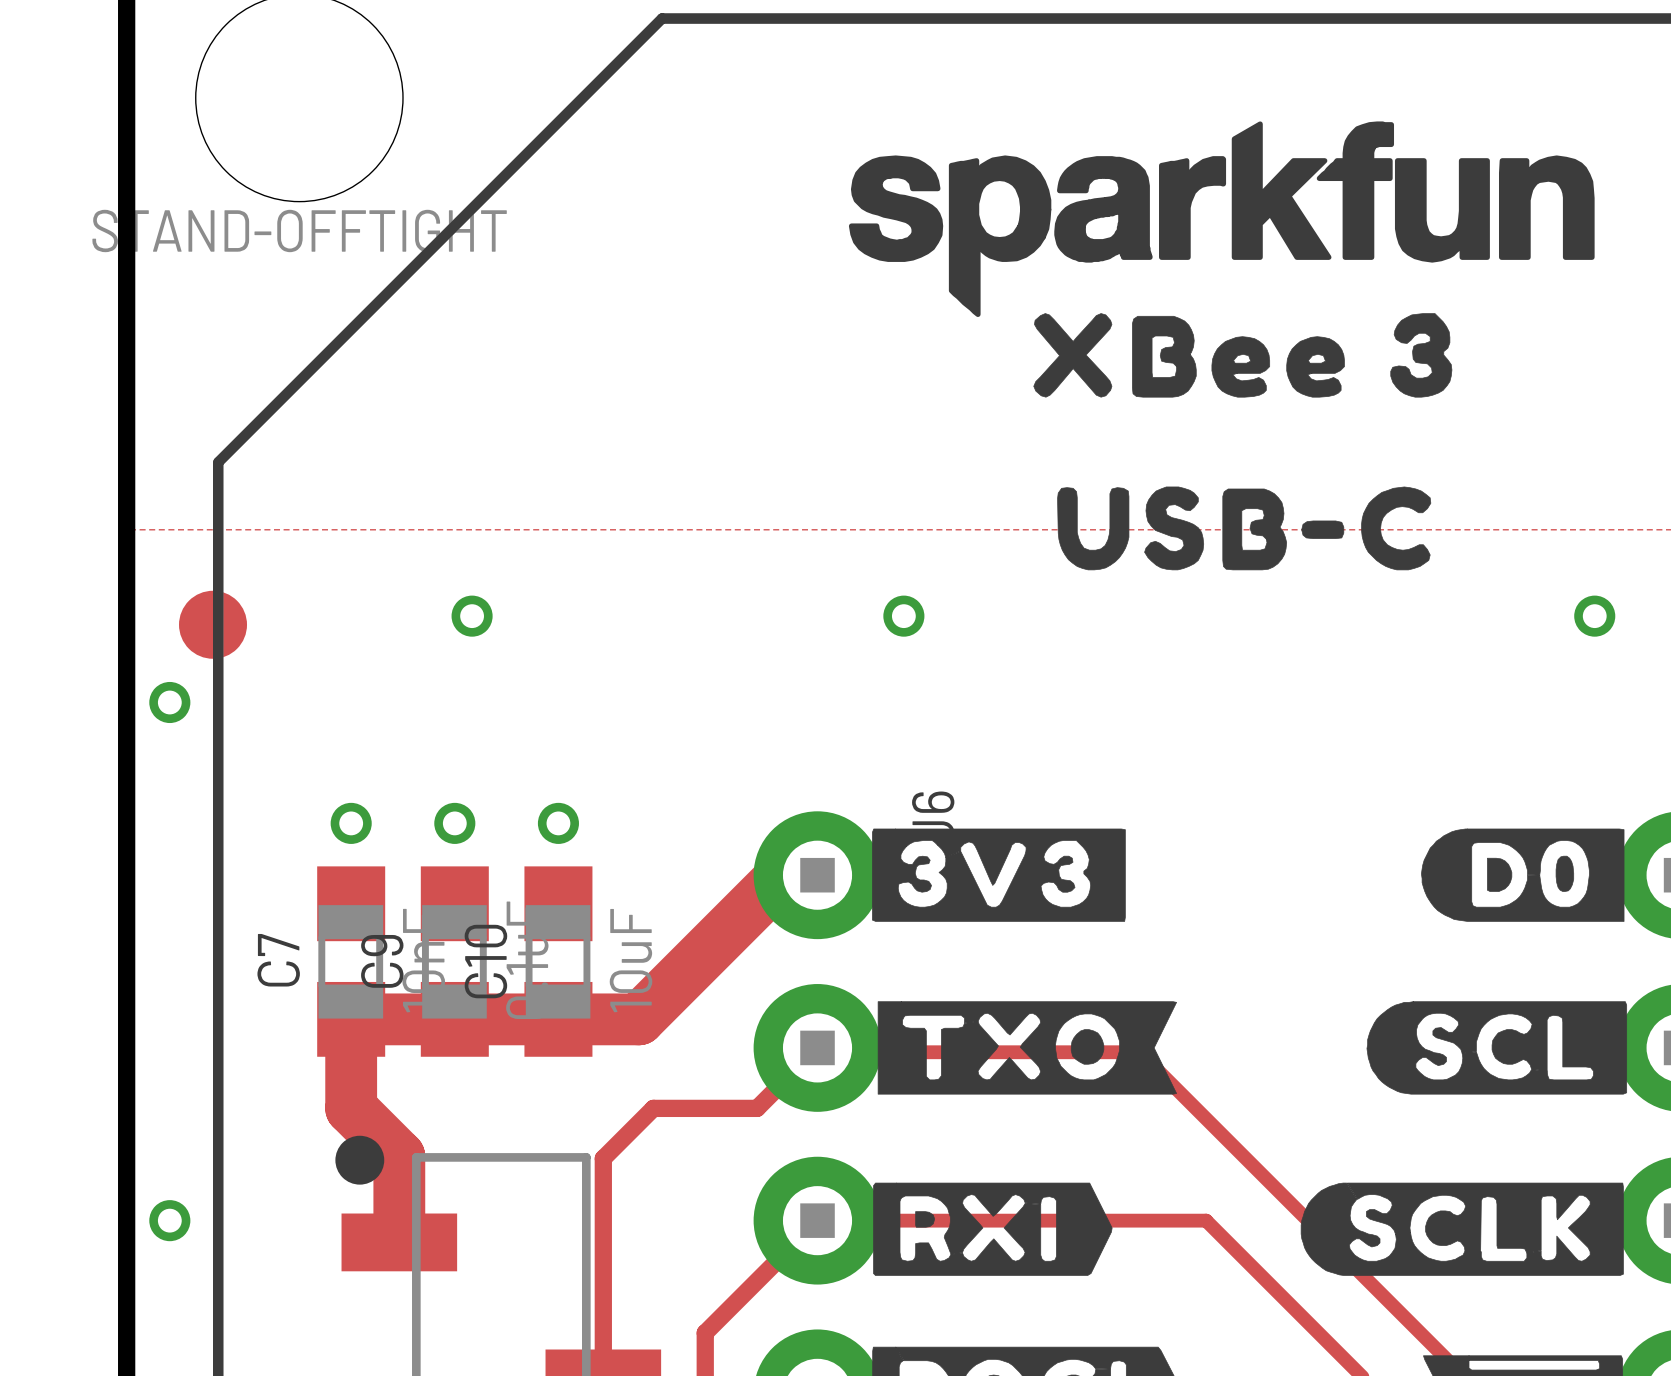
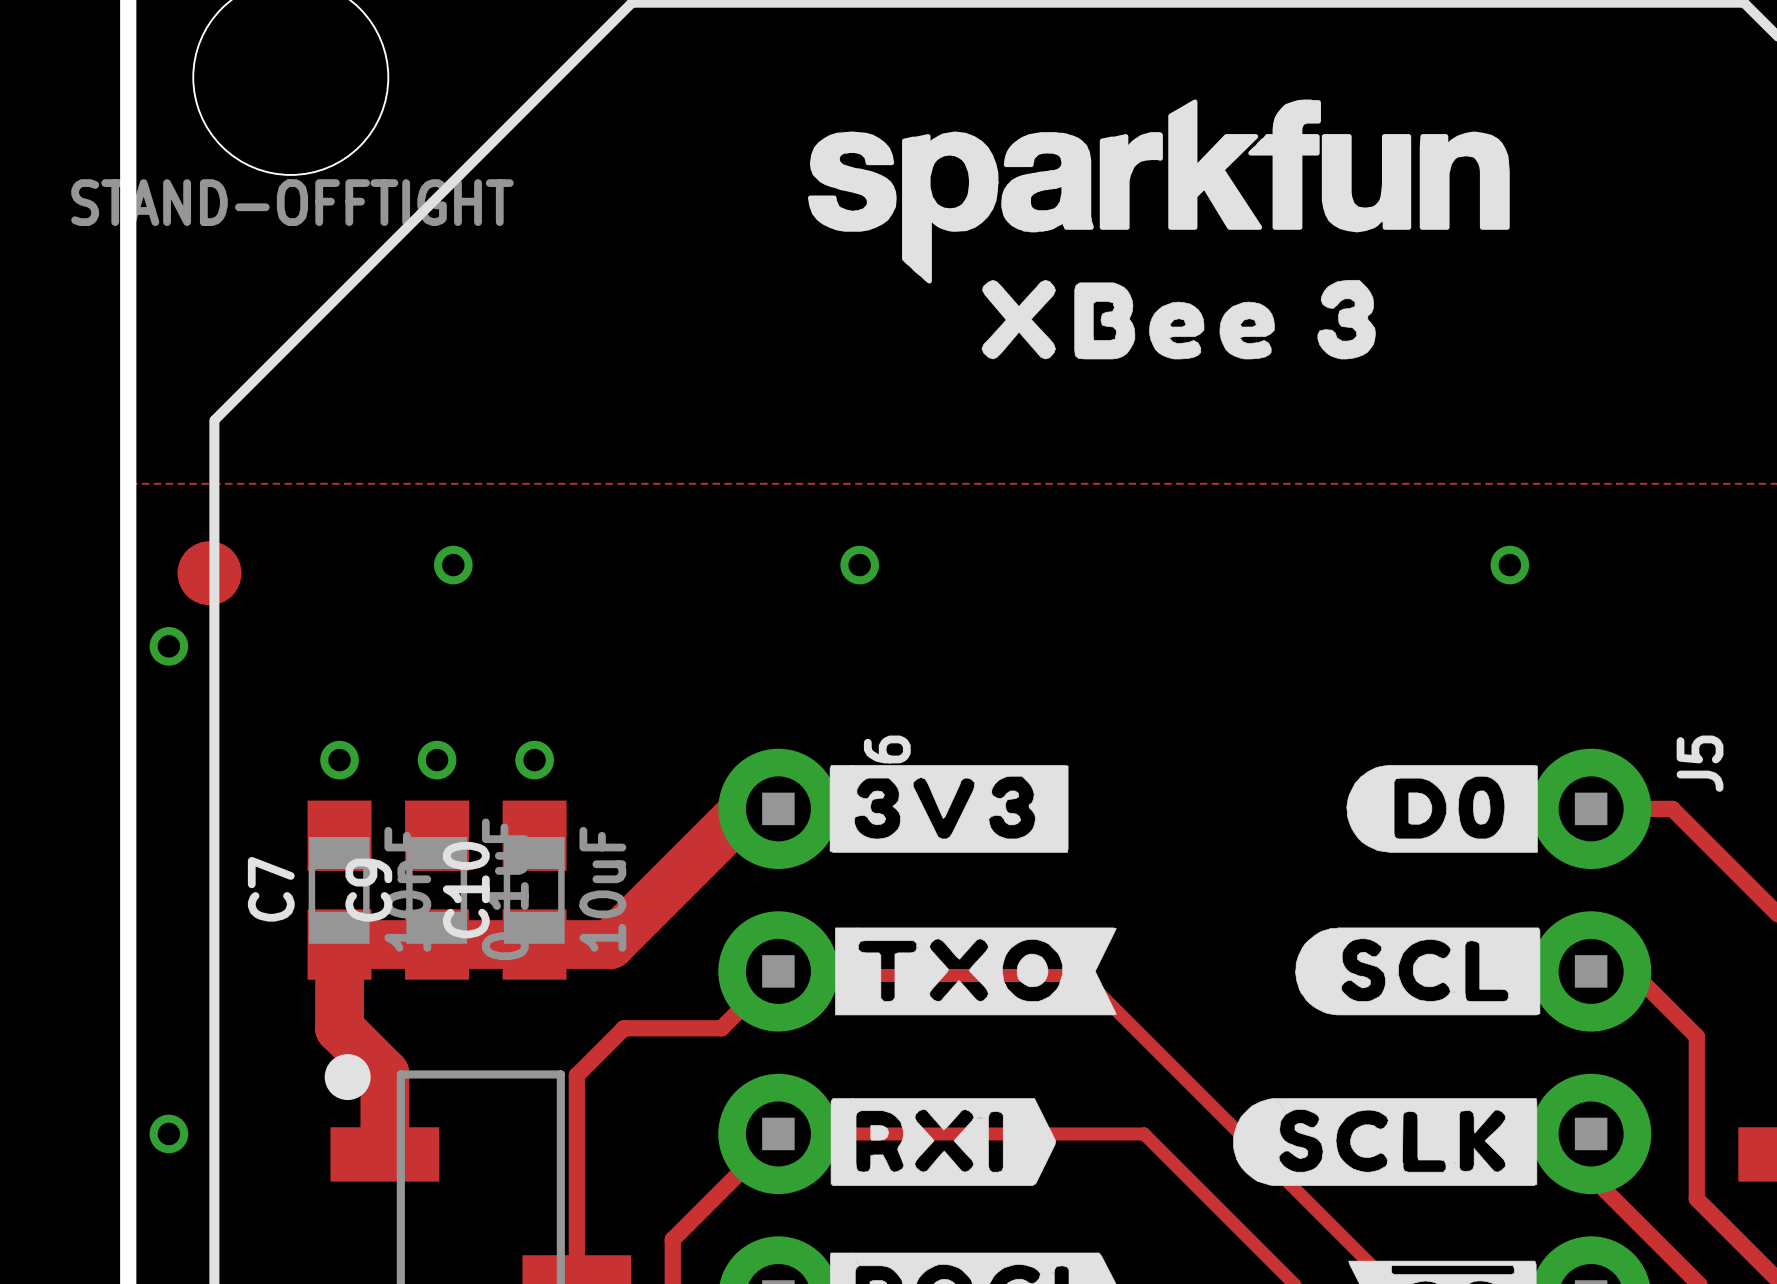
drawing: [1057, 486, 1432, 571] -> none

